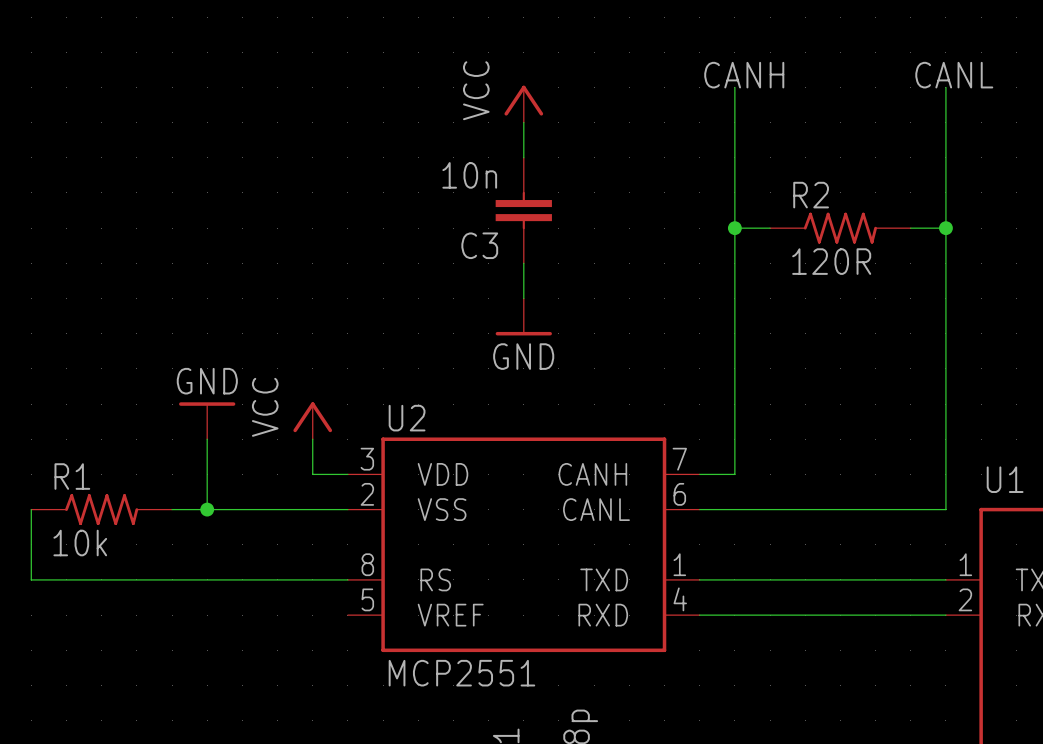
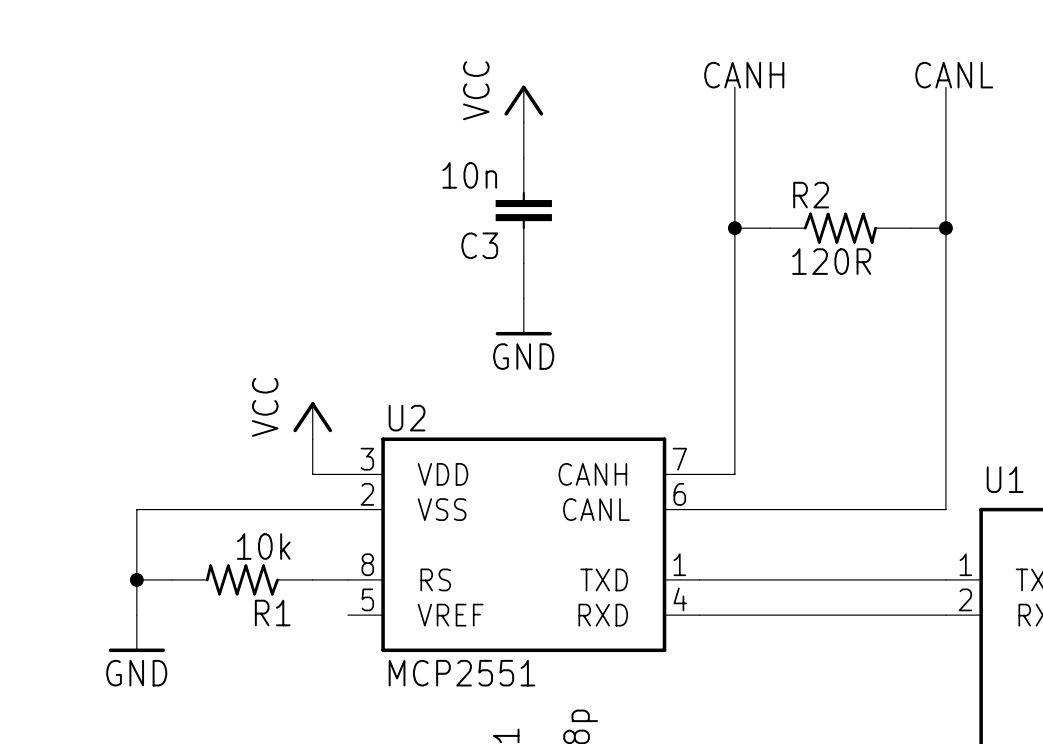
power symbol rotation: 0° (207, 404) -> 180° (136, 650)
power symbol position: GND (207, 420) -> GND (136, 633)
wire: (207, 439) (207, 509) -> none
wire: (31, 509) (31, 579) (136, 579) -> none
R1 rotation: 0° (101, 509) -> 180° (242, 579)
R1 position: (101, 509) -> (242, 579)
wire: none -> (172, 509) (136, 509) (136, 615)
junction: (207, 509) -> none
junction: none -> (136, 579)

